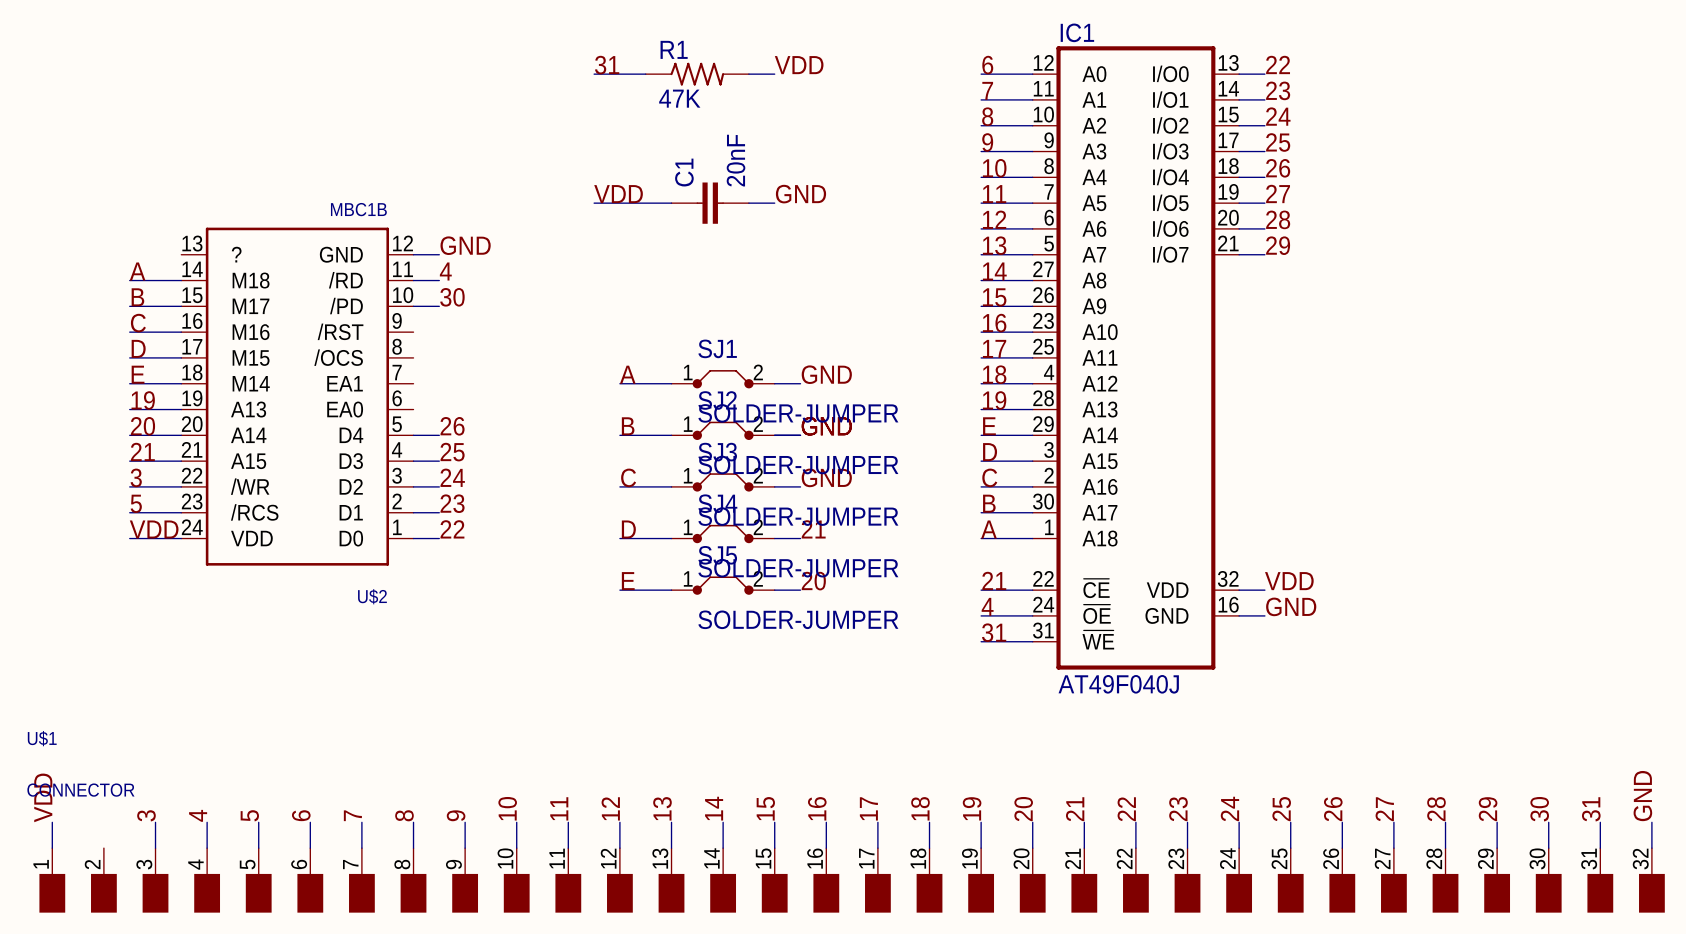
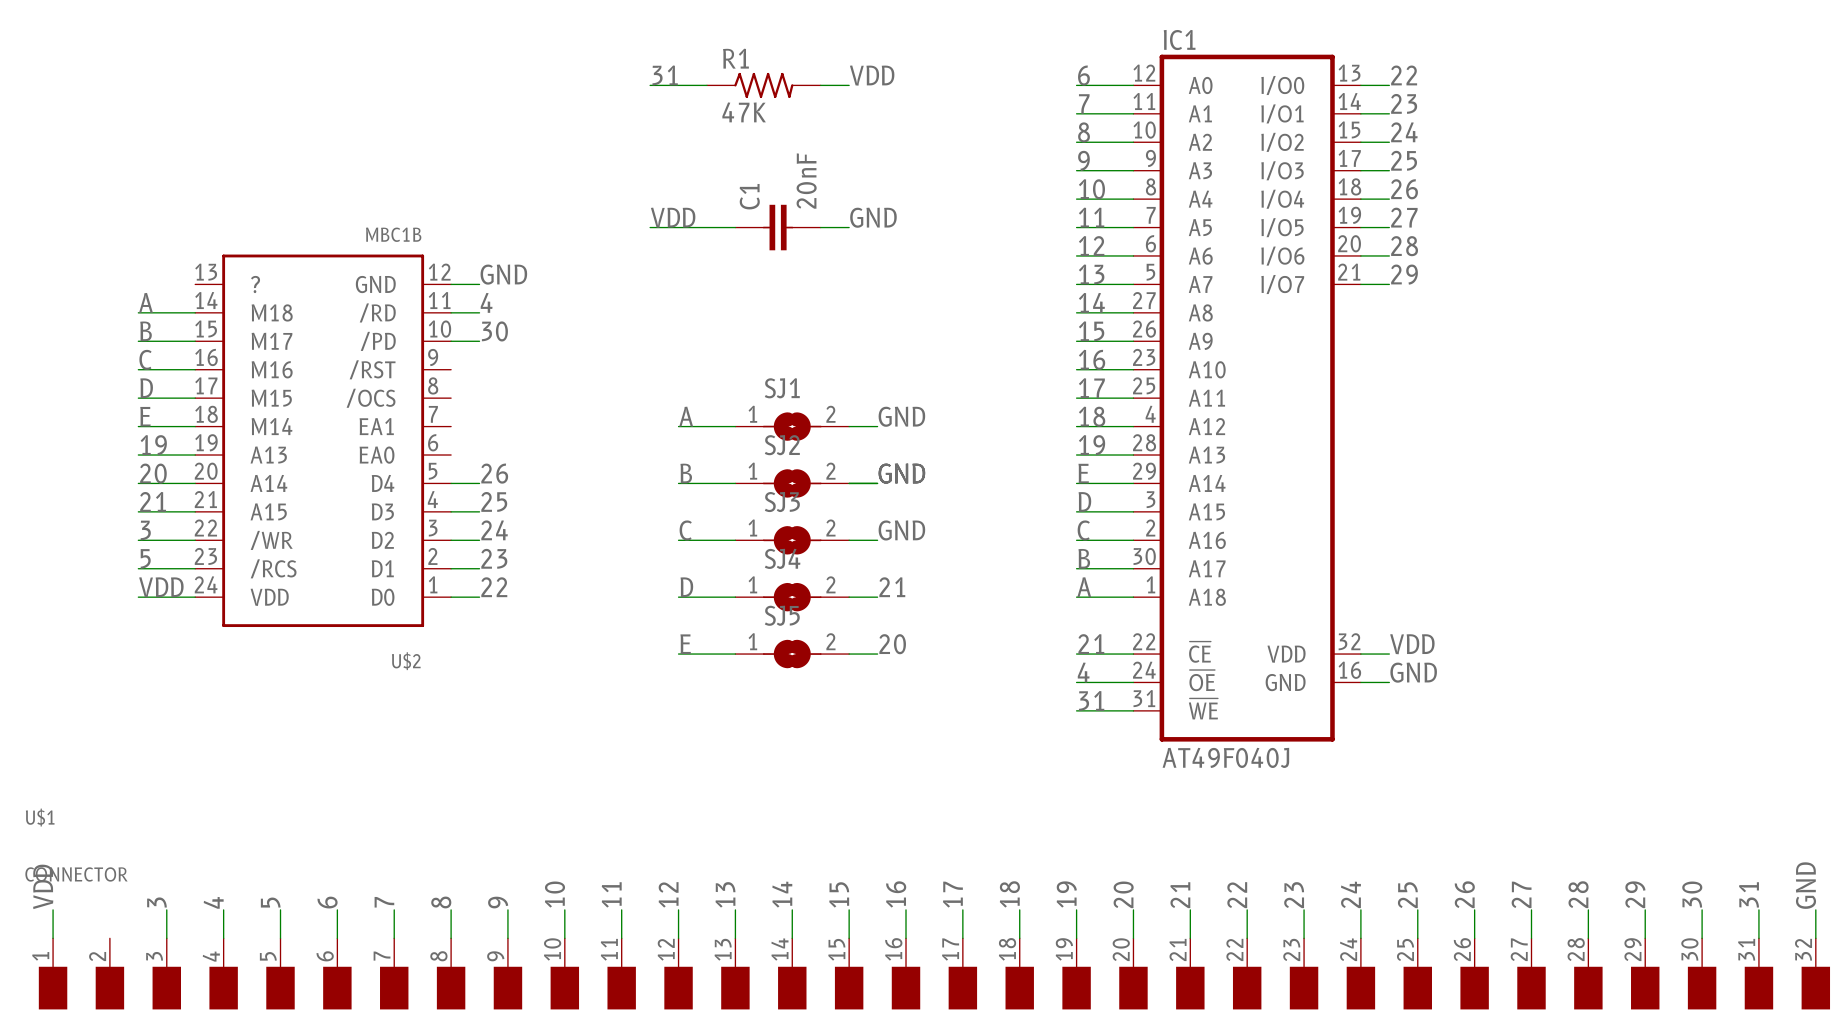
SJ1 symbol: [671, 370, 775, 389] -> [735, 412, 850, 441]
SJ1 value: SOLDER-JUMPER (798, 413) -> none
SJ2 symbol: [671, 421, 775, 440] -> [735, 469, 850, 498]
SJ2 value: SOLDER-JUMPER (798, 465) -> none
SJ3 symbol: [671, 473, 775, 492] -> [735, 526, 850, 555]
SJ3 value: SOLDER-JUMPER (798, 516) -> none
SJ4 symbol: [671, 524, 775, 544] -> [735, 582, 850, 612]
SJ4 value: SOLDER-JUMPER (798, 568) -> none
SJ5 symbol: [671, 576, 775, 595] -> [735, 639, 850, 669]
SJ5 value: SOLDER-JUMPER (798, 619) -> none

